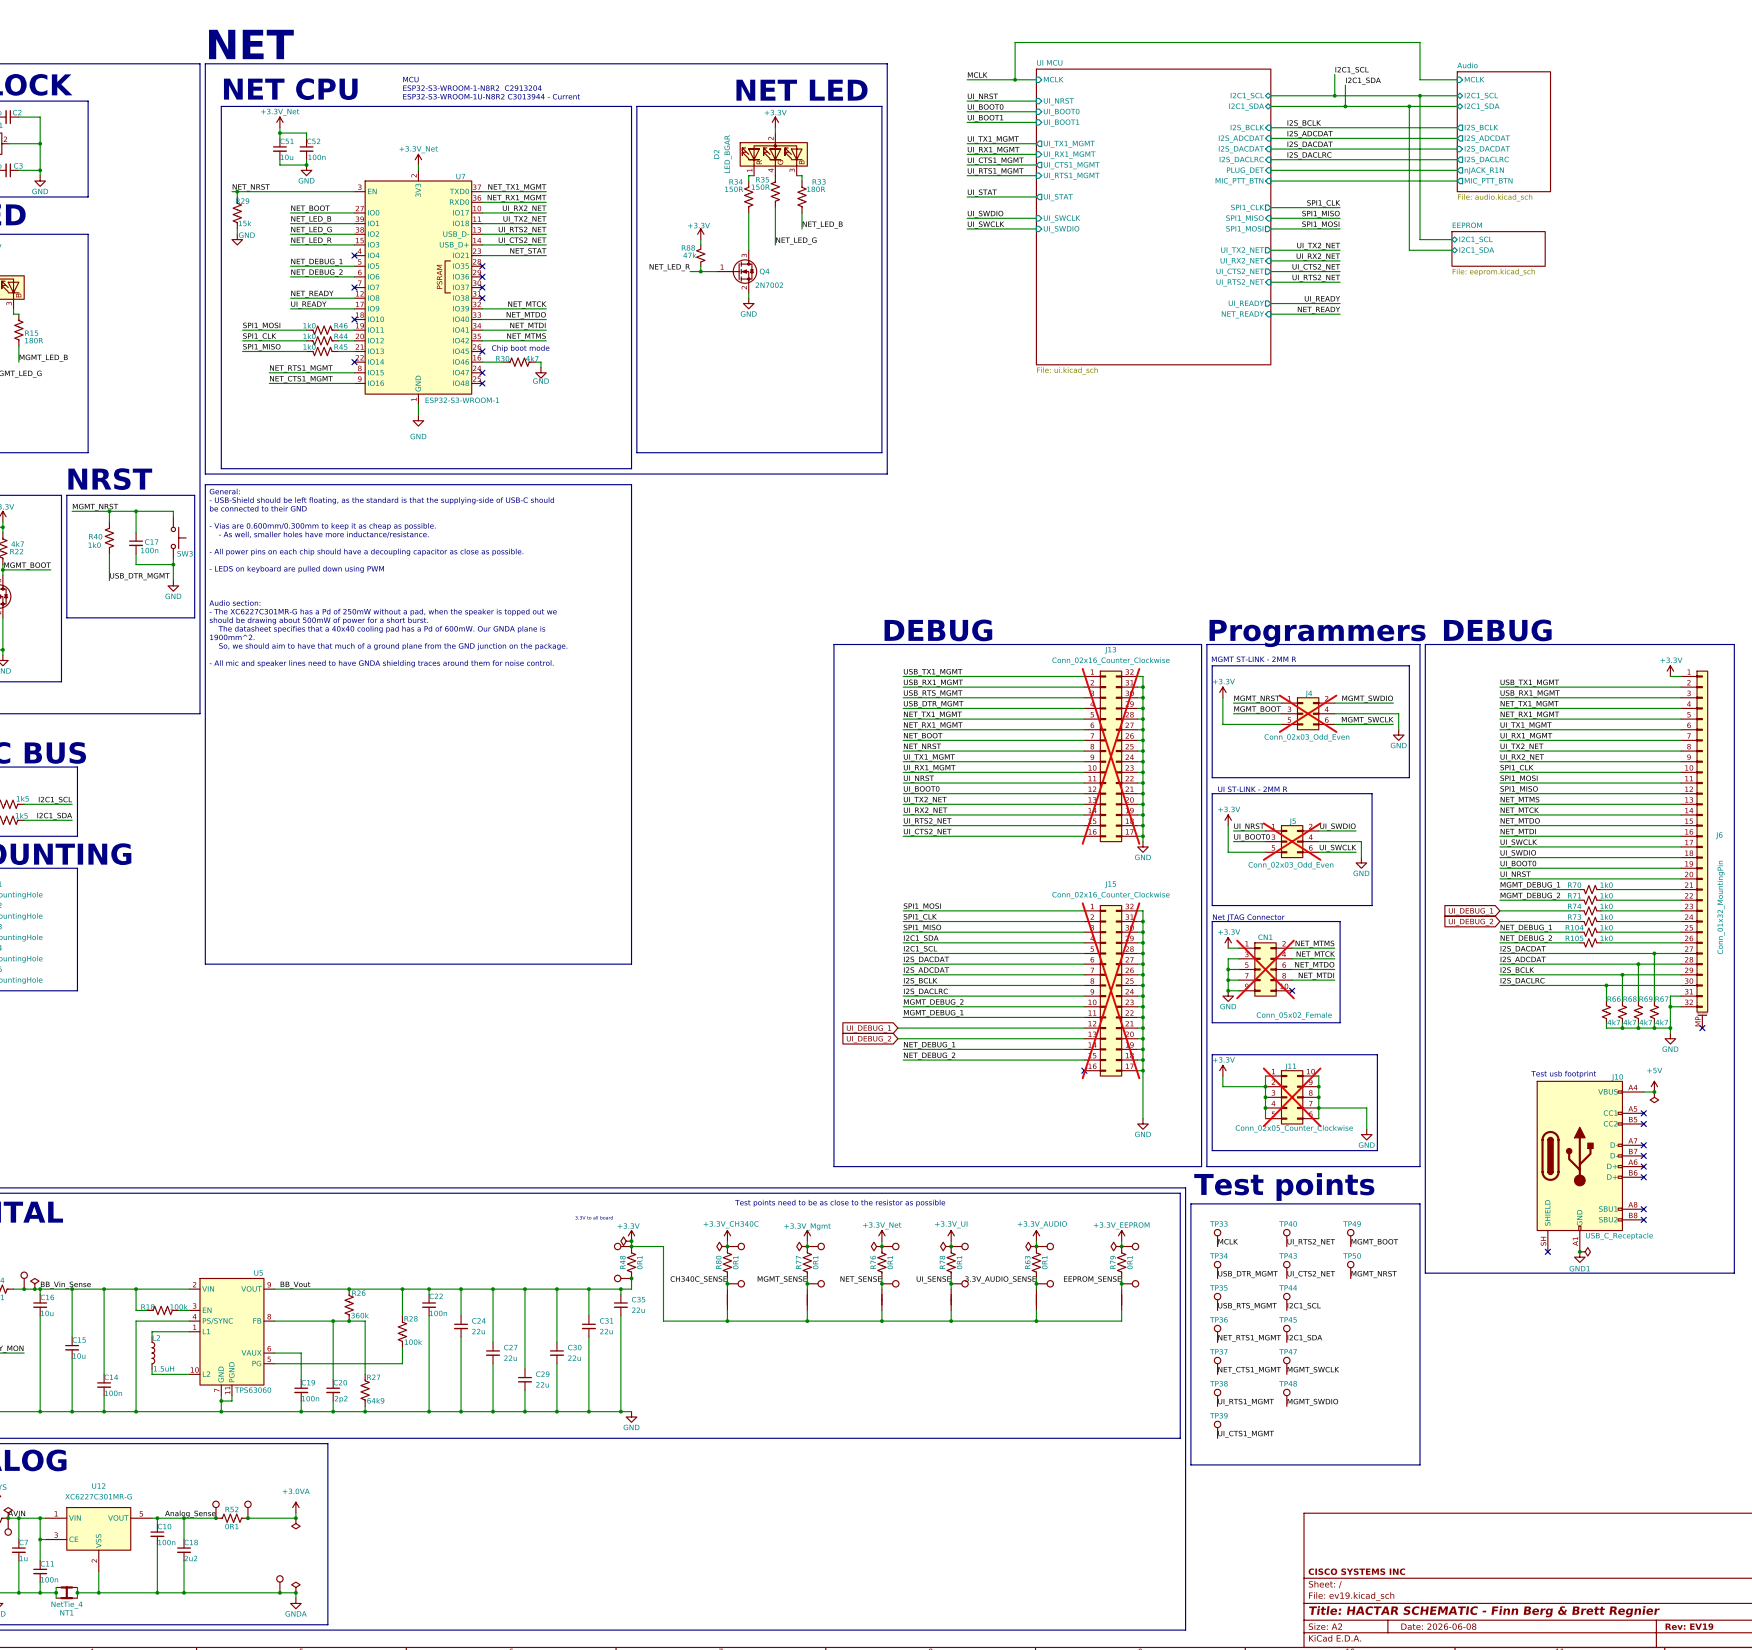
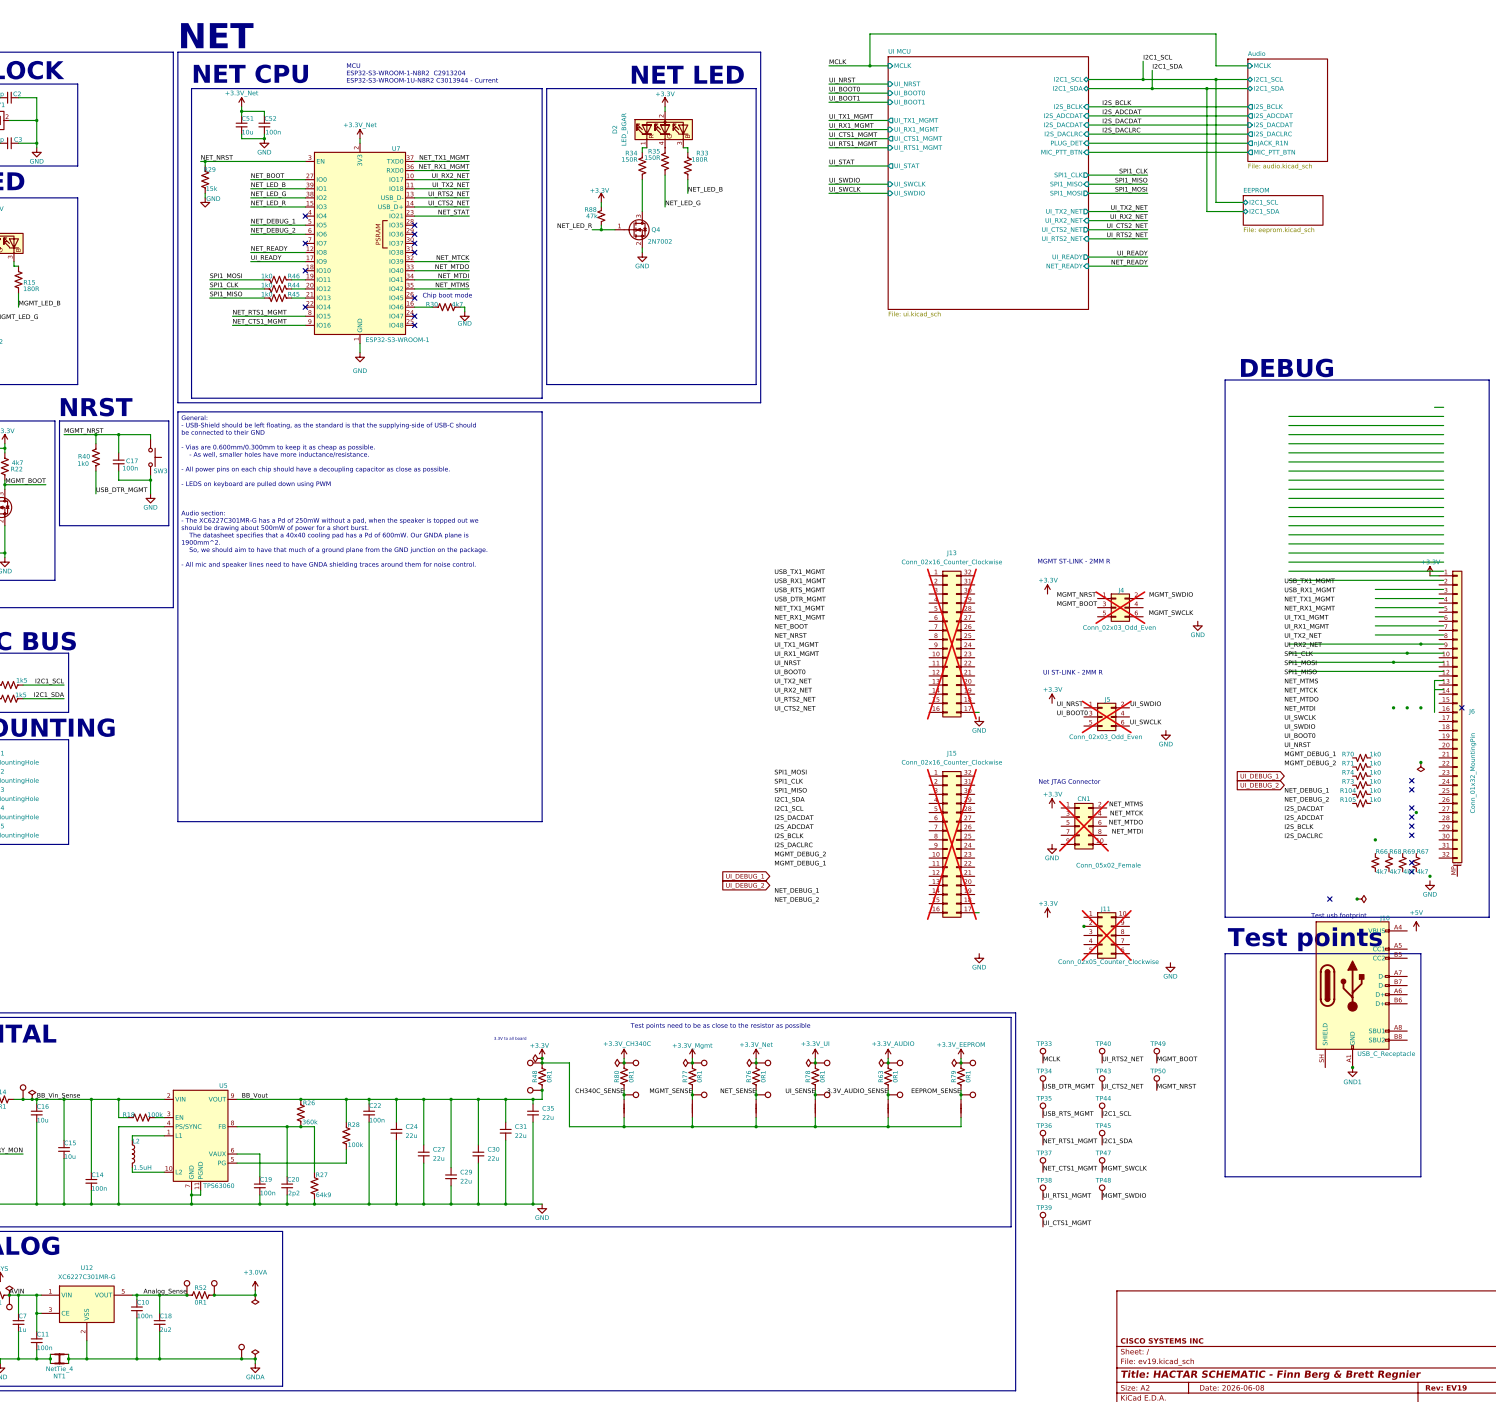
text: none -> DEBUG (1287, 367)
wire: none -> (1434, 407) (1443, 407)
wire: none -> (1288, 416) (1443, 416)
wire: none -> (1288, 425) (1443, 425)
wire: none -> (1288, 434) (1443, 434)
wire: none -> (1288, 443) (1443, 443)
wire: none -> (1288, 452) (1443, 452)
wire: none -> (1288, 461) (1443, 461)
wire: none -> (1288, 471) (1443, 471)
wire: none -> (1288, 480) (1443, 480)
wire: none -> (1288, 489) (1443, 489)
wire: none -> (1288, 498) (1443, 498)
text: DEBUG (938, 630) -> none
text: DEBUG (1497, 630) -> none
text: Programmers (1317, 633) -> none
line: (833, 644) (1201, 644) (1201, 1166) (833, 1166) (833, 644) -> none
line: (1206, 644) (1420, 644) (1420, 1166) (1206, 1166) (1206, 644) -> none
line: (1425, 644) (1734, 644) (1734, 1273) (1425, 1273) (1425, 644) -> (1225, 380) (1489, 380) (1489, 917) (1225, 917) (1225, 380)
line: (1212, 665) (1212, 777) (1409, 777) (1409, 665) (1212, 665) -> none
wire: (903, 676) (1084, 676) -> none
wire: (1137, 676) (1142, 676) (1142, 841) -> none
wire: (903, 687) (1084, 687) -> none
wire: (1137, 687) (1142, 687) -> none
junction: (1142, 687) -> none
wire: (1499, 687) (1681, 687) -> (1288, 507) (1443, 507)
wire: none -> (1375, 589) (1443, 589)
wire: (903, 697) (1084, 697) -> none
wire: (1137, 697) (1142, 697) -> none
junction: (1142, 697) -> none
wire: (1222, 697) (1222, 724) (1281, 724) -> none
wire: (1499, 697) (1681, 697) -> (1288, 516) (1443, 516)
wire: (1233, 703) (1281, 703) -> none
wire: (1334, 703) (1393, 703) -> none
wire: none -> (1375, 598) (1443, 598)
wire: (903, 708) (1084, 708) -> none
wire: (1137, 708) (1142, 708) -> none
junction: (1142, 708) -> none
wire: (1499, 708) (1681, 708) -> (1288, 525) (1443, 525)
wire: (1233, 713) (1281, 713) -> none
wire: (1334, 713) (1398, 713) (1398, 729) -> none
wire: none -> (1375, 607) (1443, 607)
wire: (903, 719) (1084, 719) -> none
wire: (1137, 719) (1142, 719) -> none
junction: (1142, 719) -> none
wire: (1499, 719) (1681, 719) -> (1288, 534) (1443, 534)
wire: (1334, 724) (1393, 724) -> none
wire: none -> (1375, 616) (1443, 616)
wire: (903, 729) (1084, 729) -> none
wire: (1137, 729) (1142, 729) -> none
junction: (1142, 729) -> none
wire: (1499, 729) (1681, 729) -> (1288, 543) (1443, 543)
wire: none -> (1375, 625) (1443, 625)
wire: (903, 740) (1084, 740) -> none
wire: (1137, 740) (1142, 740) -> none
junction: (1142, 740) -> none
wire: (1499, 740) (1681, 740) -> (1288, 553) (1443, 553)
wire: none -> (1375, 634) (1443, 634)
wire: (903, 751) (1084, 751) -> none
wire: (1137, 751) (1142, 751) -> none
junction: (1142, 751) -> none
wire: (1499, 751) (1681, 751) -> (1288, 562) (1443, 562)
junction: none -> (1420, 644)
wire: (903, 761) (1084, 761) -> none
wire: (1137, 761) (1142, 761) -> none
junction: (1142, 761) -> none
wire: (1499, 761) (1681, 761) -> (1288, 571) (1443, 571)
junction: none -> (1407, 653)
wire: (903, 772) (1084, 772) -> none
wire: (1137, 772) (1142, 772) -> none
junction: (1142, 772) -> none
wire: (1499, 772) (1681, 772) -> (1288, 580) (1443, 580)
junction: none -> (1393, 662)
wire: (903, 783) (1084, 783) -> none
wire: (1137, 783) (1142, 783) -> none
junction: (1142, 783) -> none
wire: (1499, 783) (1681, 783) -> none
wire: (903, 793) (1084, 793) -> none
wire: (1137, 793) (1142, 793) -> none
junction: (1142, 793) -> none
line: (1212, 793) (1212, 905) (1372, 905) (1372, 793) (1212, 793) -> none
wire: (1499, 793) (1681, 793) -> none
wire: none -> (1443, 680) (1434, 680) (1434, 712)
wire: (903, 804) (1084, 804) -> none
wire: (1137, 804) (1142, 804) -> none
junction: (1142, 804) -> none
wire: (1499, 804) (1681, 804) -> none
wire: none -> (1434, 689) (1443, 689)
wire: (903, 814) (1084, 814) -> none
wire: (1137, 814) (1142, 814) -> none
junction: (1142, 814) -> none
wire: (1499, 814) (1681, 814) -> none
wire: (903, 825) (1084, 825) -> none
wire: (1137, 825) (1142, 825) -> none
junction: (1142, 825) -> none
wire: (1228, 825) (1228, 852) (1265, 852) -> none
wire: (1499, 825) (1681, 825) -> none
wire: (1233, 830) (1265, 830) -> none
wire: (1318, 830) (1356, 830) -> none
junction: none -> (1393, 707)
junction: none -> (1407, 707)
junction: none -> (1420, 707)
no-connect mark: none -> (1461, 707)
wire: (903, 836) (1084, 836) -> none
junction: (1142, 836) -> none
wire: (1499, 836) (1681, 836) -> none
wire: (1233, 841) (1265, 841) -> none
wire: (1318, 841) (1361, 841) (1361, 857) -> none
wire: (1499, 846) (1681, 846) -> (1288, 644) (1443, 644)
wire: (1318, 852) (1356, 852) -> none
wire: (1499, 857) (1681, 857) -> (1288, 653) (1443, 653)
wire: (1499, 868) (1681, 868) -> (1288, 662) (1443, 662)
wire: (1499, 878) (1681, 878) -> (1288, 671) (1443, 671)
wire: (1499, 889) (1579, 889) -> none
wire: (1601, 889) (1681, 889) -> none
junction: none -> (1420, 762)
wire: (1499, 900) (1579, 900) -> none
wire: (1601, 900) (1681, 900) -> none
power symbol: none -> (1420, 767)
wire: (903, 910) (1084, 910) -> none
wire: (1137, 910) (1142, 910) (1142, 1118) -> none
wire: (1499, 910) (1579, 910) -> none
wire: (1601, 910) (1681, 910) -> none
no-connect mark: none -> (1411, 780)
wire: (903, 921) (1084, 921) -> none
wire: (1137, 921) (1142, 921) -> none
junction: (1142, 921) -> none
line: (1212, 921) (1212, 1022) (1340, 1022) (1340, 921) (1212, 921) -> none
wire: (1499, 921) (1579, 921) -> none
wire: (1601, 921) (1681, 921) -> none
no-connect mark: none -> (1411, 789)
wire: (903, 932) (1084, 932) -> none
wire: (1137, 932) (1142, 932) -> none
junction: (1142, 932) -> none
wire: (1499, 932) (1579, 932) -> none
wire: (1601, 932) (1681, 932) -> none
wire: (903, 942) (1084, 942) -> none
wire: (1137, 942) (1142, 942) -> none
junction: (1142, 942) -> none
wire: (1499, 942) (1579, 942) -> none
wire: (1601, 942) (1681, 942) -> none
wire: (1228, 948) (1238, 948) -> none
wire: (1292, 948) (1334, 948) -> none
no-connect mark: none -> (1411, 807)
wire: (903, 953) (1084, 953) -> none
wire: (1137, 953) (1142, 953) -> none
junction: (1142, 953) -> none
wire: (1499, 953) (1681, 953) -> none
wire: (1654, 953) (1654, 1001) -> none
wire: (1238, 958) (1228, 958) (1228, 990) (1238, 990) -> none
wire: (1292, 958) (1334, 958) -> none
no-connect mark: none -> (1411, 817)
wire: (903, 964) (1084, 964) -> none
wire: (1137, 964) (1142, 964) -> none
junction: (1142, 964) -> none
wire: (1499, 964) (1681, 964) -> none
wire: (1638, 964) (1638, 1001) -> none
junction: (1638, 964) -> none
wire: (1228, 969) (1238, 969) -> none
junction: (1228, 969) -> none
wire: (1292, 969) (1334, 969) -> none
no-connect mark: none -> (1411, 826)
wire: (903, 974) (1084, 974) -> none
wire: (1137, 974) (1142, 974) -> none
junction: (1142, 974) -> none
wire: (1499, 974) (1681, 974) -> none
wire: (1622, 974) (1622, 1001) -> none
junction: (1622, 974) -> none
wire: (1228, 980) (1238, 980) -> none
junction: (1228, 980) -> none
wire: (1292, 980) (1334, 980) -> none
no-connect mark: none -> (1411, 835)
wire: (903, 985) (1084, 985) -> none
wire: (1137, 985) (1142, 985) -> none
junction: (1142, 985) -> none
wire: (1499, 985) (1681, 985) -> none
wire: (1606, 985) (1606, 1001) -> none
junction: (1228, 990) -> none
no-connect mark: (1292, 990) -> none
wire: (903, 996) (1084, 996) -> none
wire: (1137, 996) (1142, 996) -> none
junction: (1142, 996) -> none
wire: (1681, 996) (1670, 996) (1670, 1033) -> none
wire: (903, 1006) (1084, 1006) -> none
wire: (1137, 1006) (1142, 1006) -> none
junction: (1142, 1006) -> none
wire: (1670, 1006) (1681, 1006) -> none
junction: (1670, 1006) -> none
no-connect mark: none -> (1411, 862)
wire: (903, 1017) (1084, 1017) -> none
wire: (1137, 1017) (1142, 1017) -> none
junction: (1142, 1017) -> none
wire: (1606, 1022) (1606, 1028) (1670, 1028) -> none
wire: (1622, 1022) (1622, 1028) -> none
wire: (1638, 1022) (1638, 1028) -> none
no-connect mark: none -> (1411, 871)
wire: (1654, 1022) (1654, 1028) -> none
wire: (897, 1028) (1084, 1028) -> none
wire: (1137, 1028) (1142, 1028) -> none
junction: (1142, 1028) -> none
junction: (1622, 1028) -> none
junction: (1638, 1028) -> none
junction: (1654, 1028) -> none
no-connect mark: (1702, 1028) -> none
wire: (897, 1038) (1084, 1038) -> none
wire: (1137, 1038) (1142, 1038) -> none
junction: (1142, 1038) -> none
wire: (903, 1049) (1084, 1049) -> none
wire: (1137, 1049) (1142, 1049) -> none
junction: (1142, 1049) -> none
line: (1212, 1054) (1377, 1054) (1377, 1150) (1212, 1150) (1212, 1054) -> none
no-connect mark: none -> (1329, 899)
junction: none -> (1357, 899)
wire: (903, 1060) (1084, 1060) -> none
wire: (1137, 1060) (1142, 1060) -> none
junction: (1142, 1060) -> none
no-connect mark: (1084, 1070) -> none
junction: (1142, 1070) -> none
wire: (1222, 1076) (1222, 1086) (1265, 1086) -> none
wire: (1265, 1076) (1265, 1118) -> none
wire: (1318, 1076) (1318, 1118) -> none
junction: (1318, 1086) -> none
wire: (1643, 1092) (1654, 1092) -> none
junction: (1654, 1092) -> none
junction: (1265, 1097) -> none
junction: (1318, 1097) -> none
power symbol rotation: 0° (1654, 1097) -> 90° counterclockwise (1361, 899)
power symbol position: (1654, 1097) -> (1361, 899)
text: none -> Test points (1304, 939)
junction: (1265, 1107) -> none
wire: (1318, 1107) (1366, 1107) (1366, 1129) -> none
junction: (1318, 1107) -> none
no-connect mark: (1643, 1113) -> none
line: none -> (1225, 953) (1225, 1176) (1420, 1176) (1420, 953) (1225, 953)
no-connect mark: (1643, 1123) -> none
no-connect mark: (1643, 1145) -> none
no-connect mark: (1643, 1155) -> none
no-connect mark: (1643, 1166) -> none
no-connect mark: (1643, 1177) -> none
text: Test points (1284, 1187) -> none
line: (1190, 1203) (1420, 1203) (1420, 1464) (1190, 1464) (1190, 1203) -> none
no-connect mark: (1643, 1209) -> none
no-connect mark: (1643, 1219) -> none
no-connect mark: (1547, 1251) -> none
power symbol: (1585, 1251) -> none

